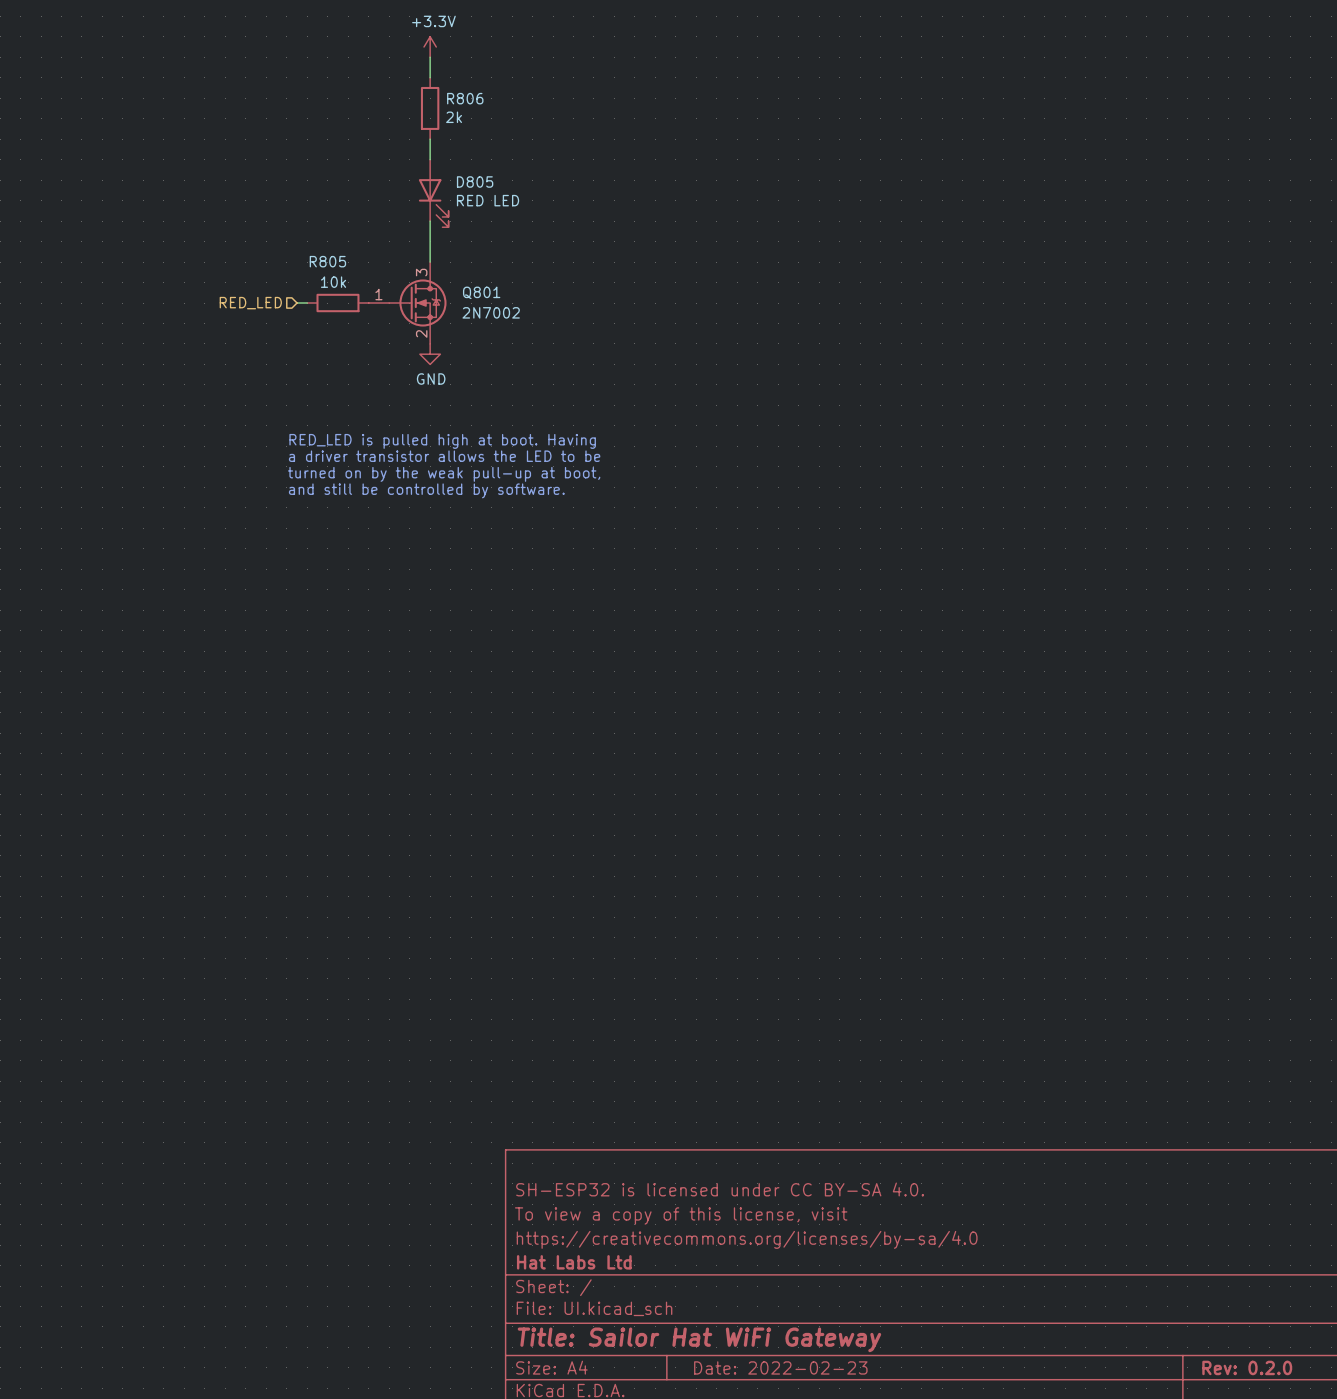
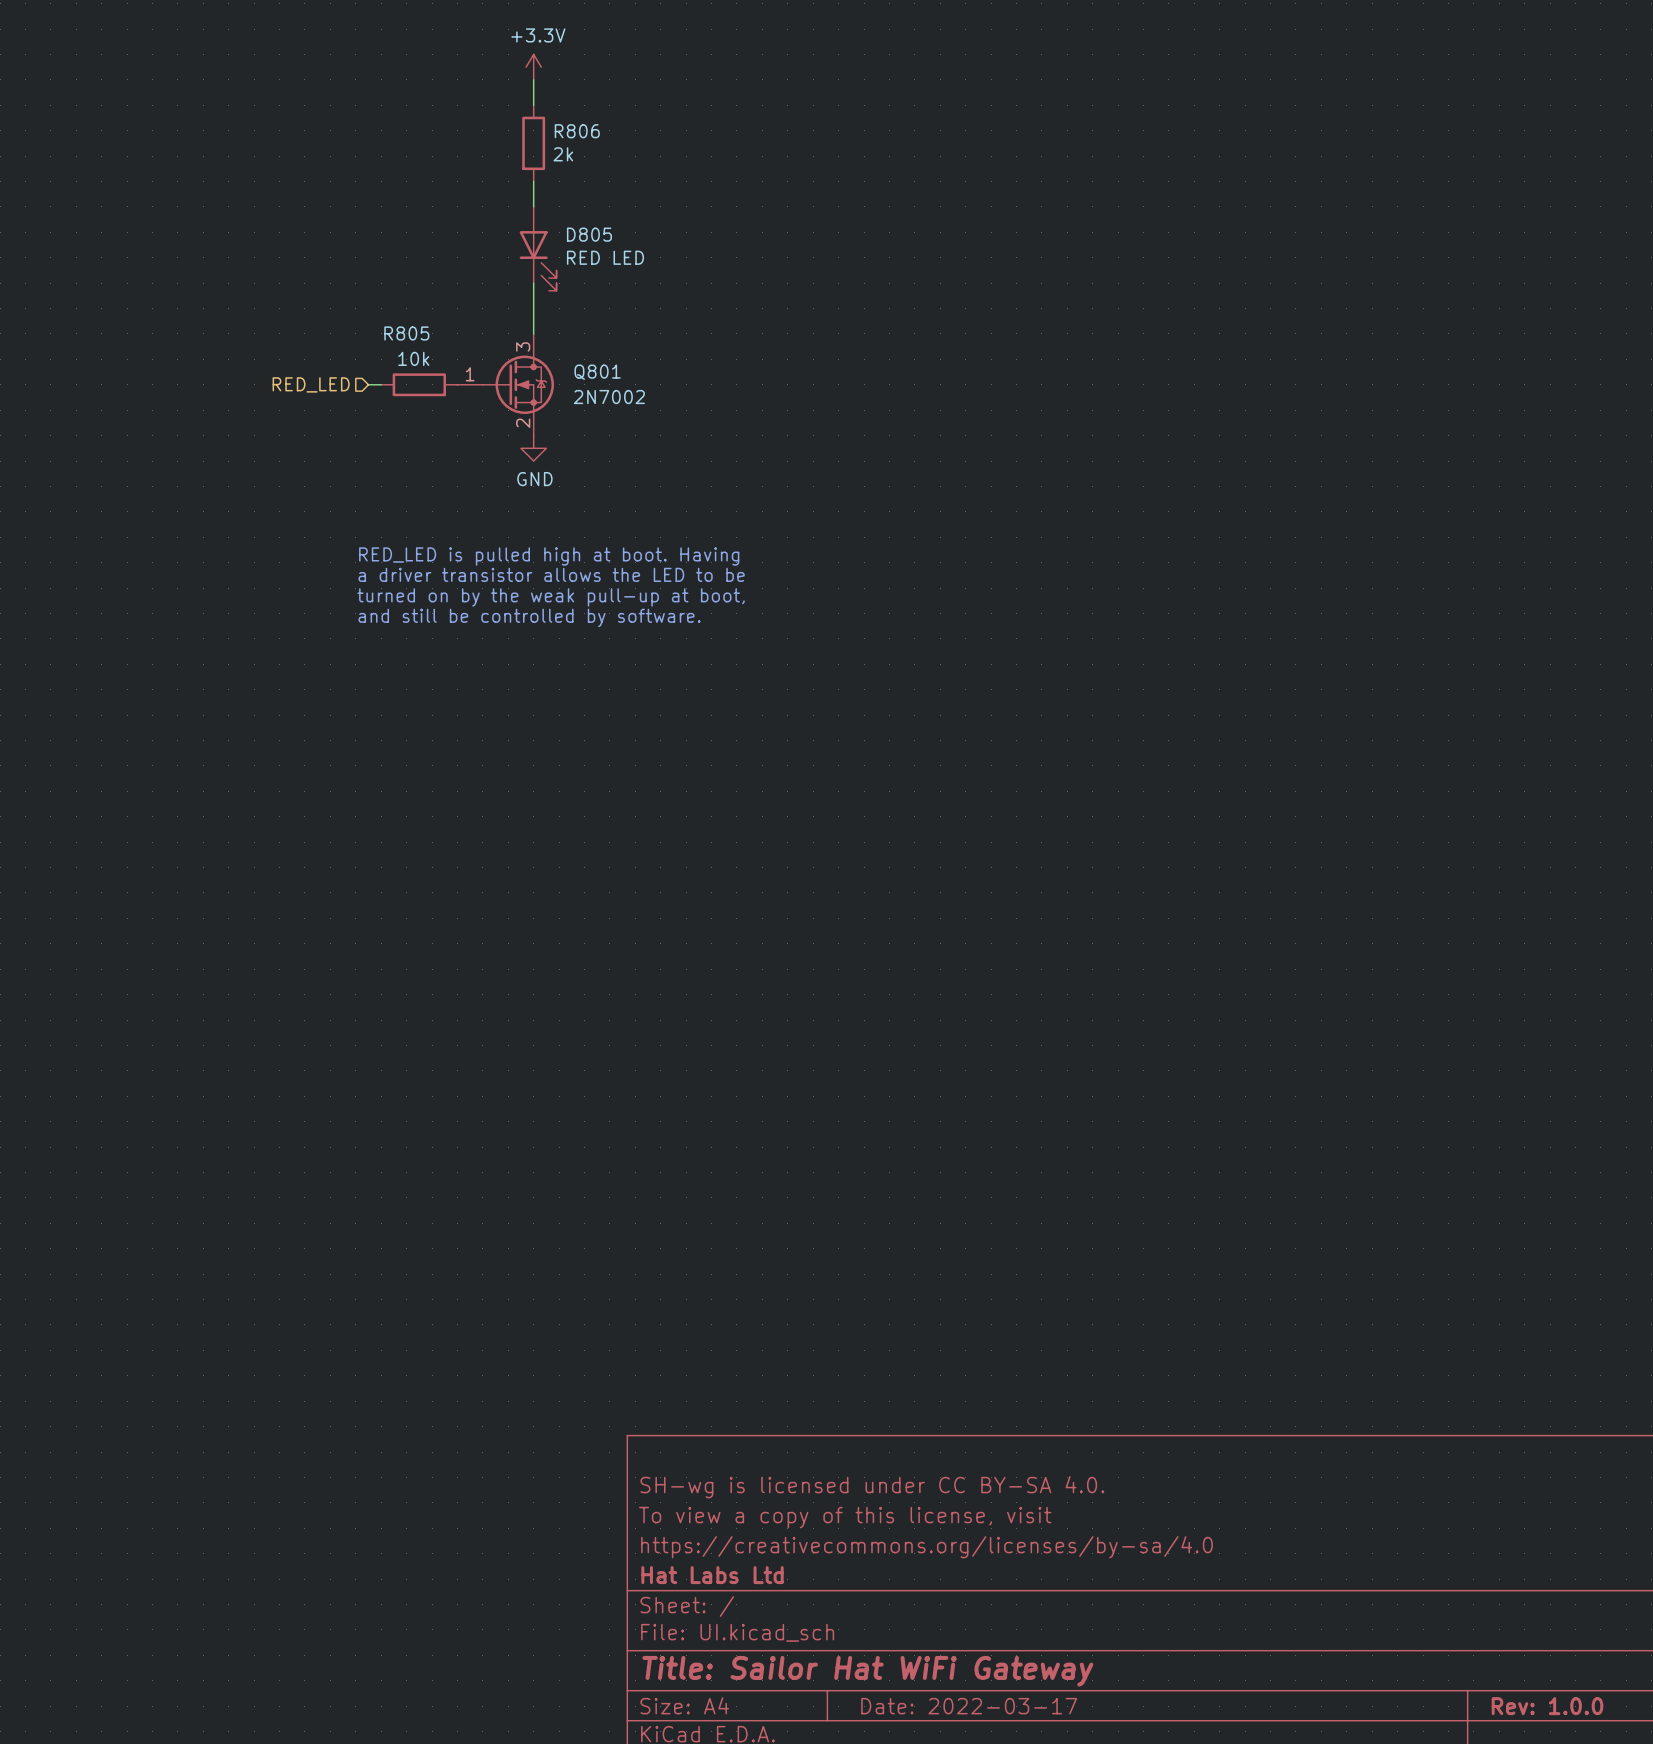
title block: SH-ESP32 is licensed under CC BY-SA 4.0. (720, 1189) -> SH-wg is licensed under CC BY-SA 4.0. (872, 1487)
title block: Date: 2022-02-23 (780, 1367) -> Date: 2022-03-17 (969, 1706)
title block: Rev: 0.2.0 (1247, 1367) -> Rev: 1.0.0 (1547, 1706)

